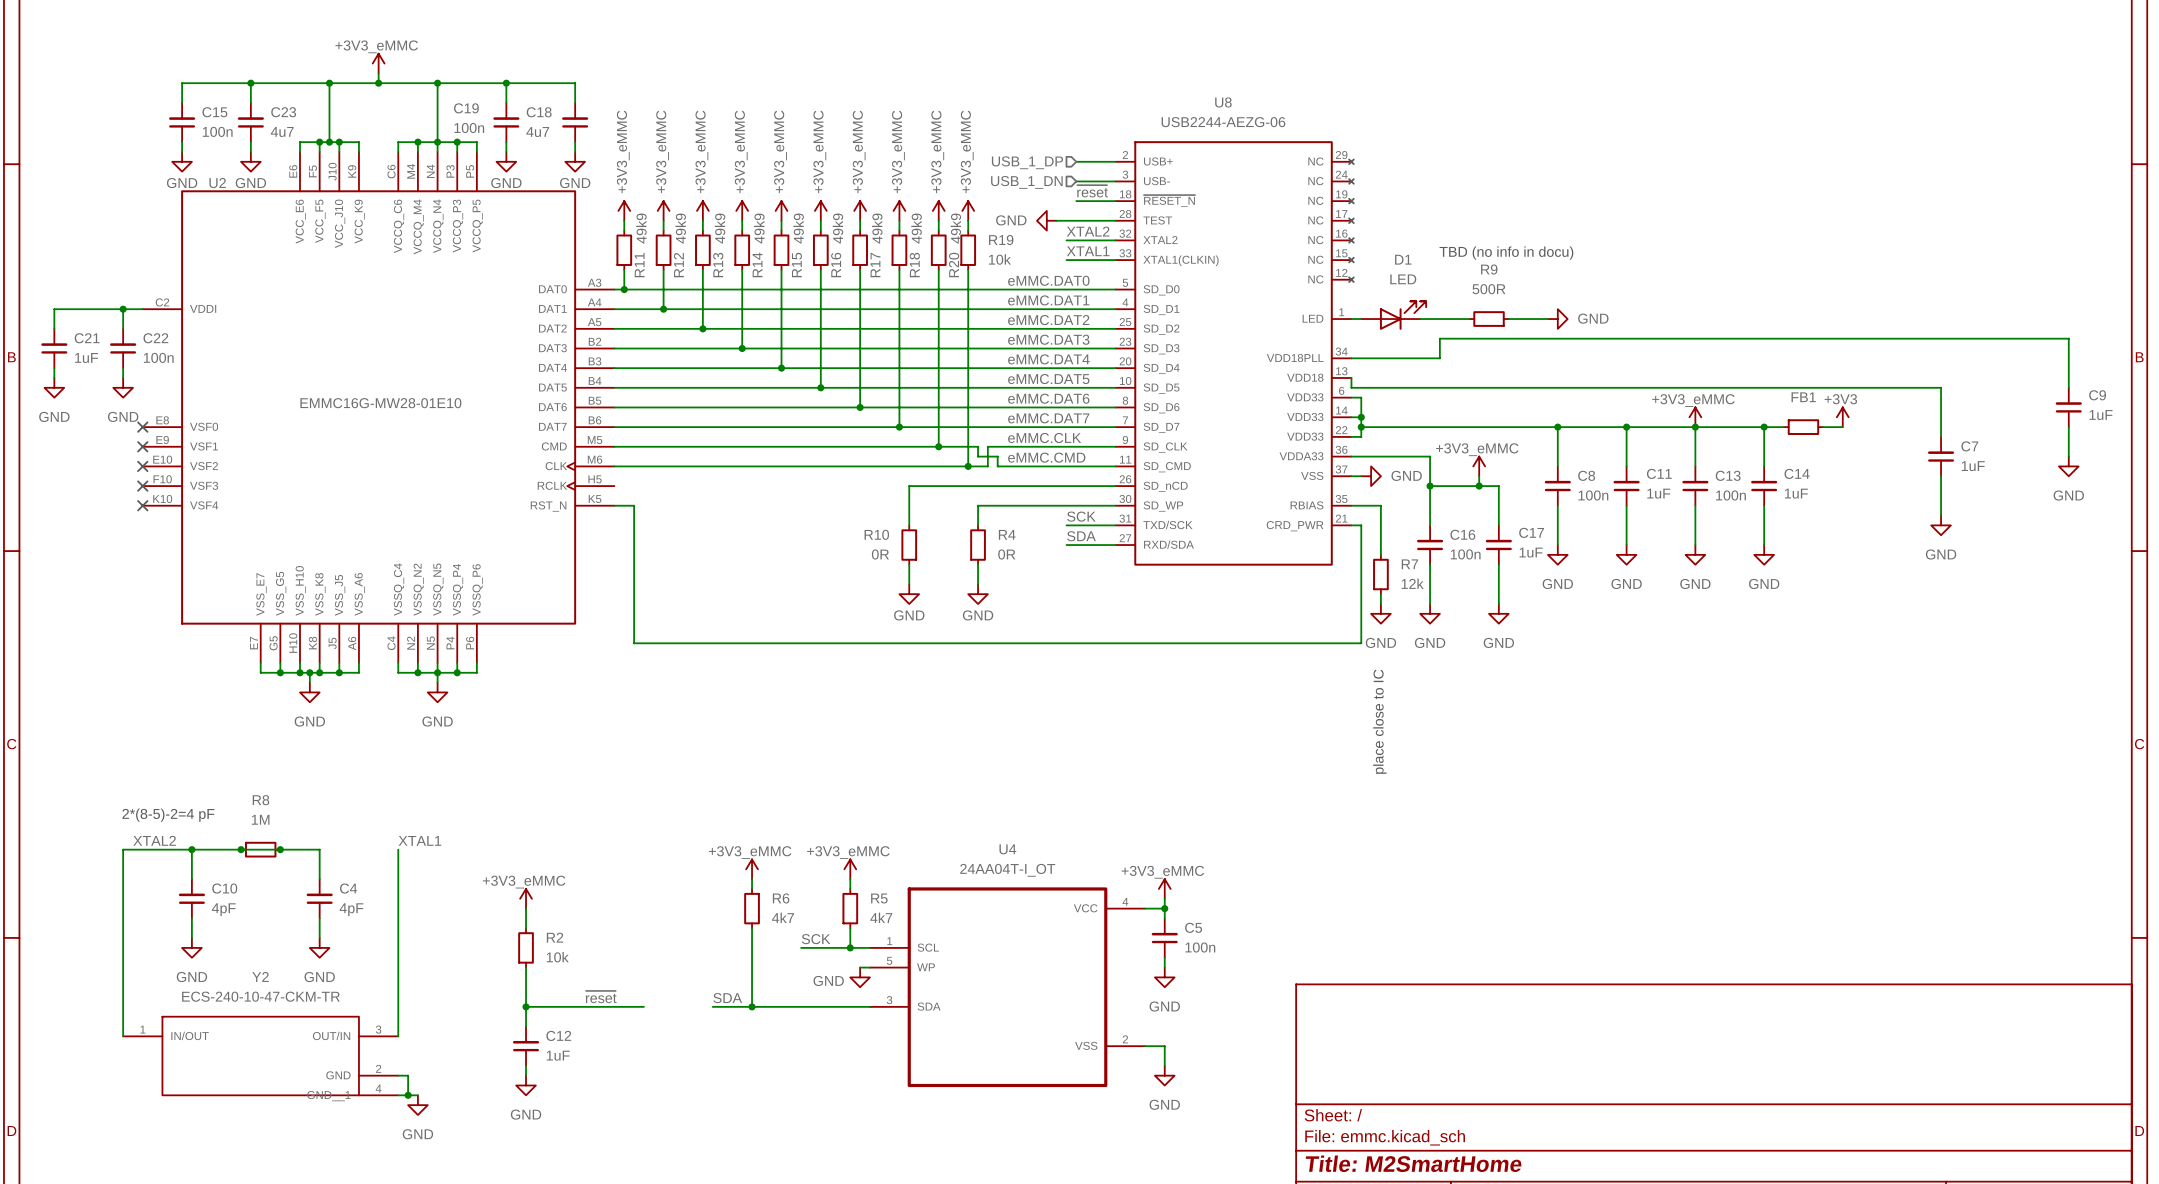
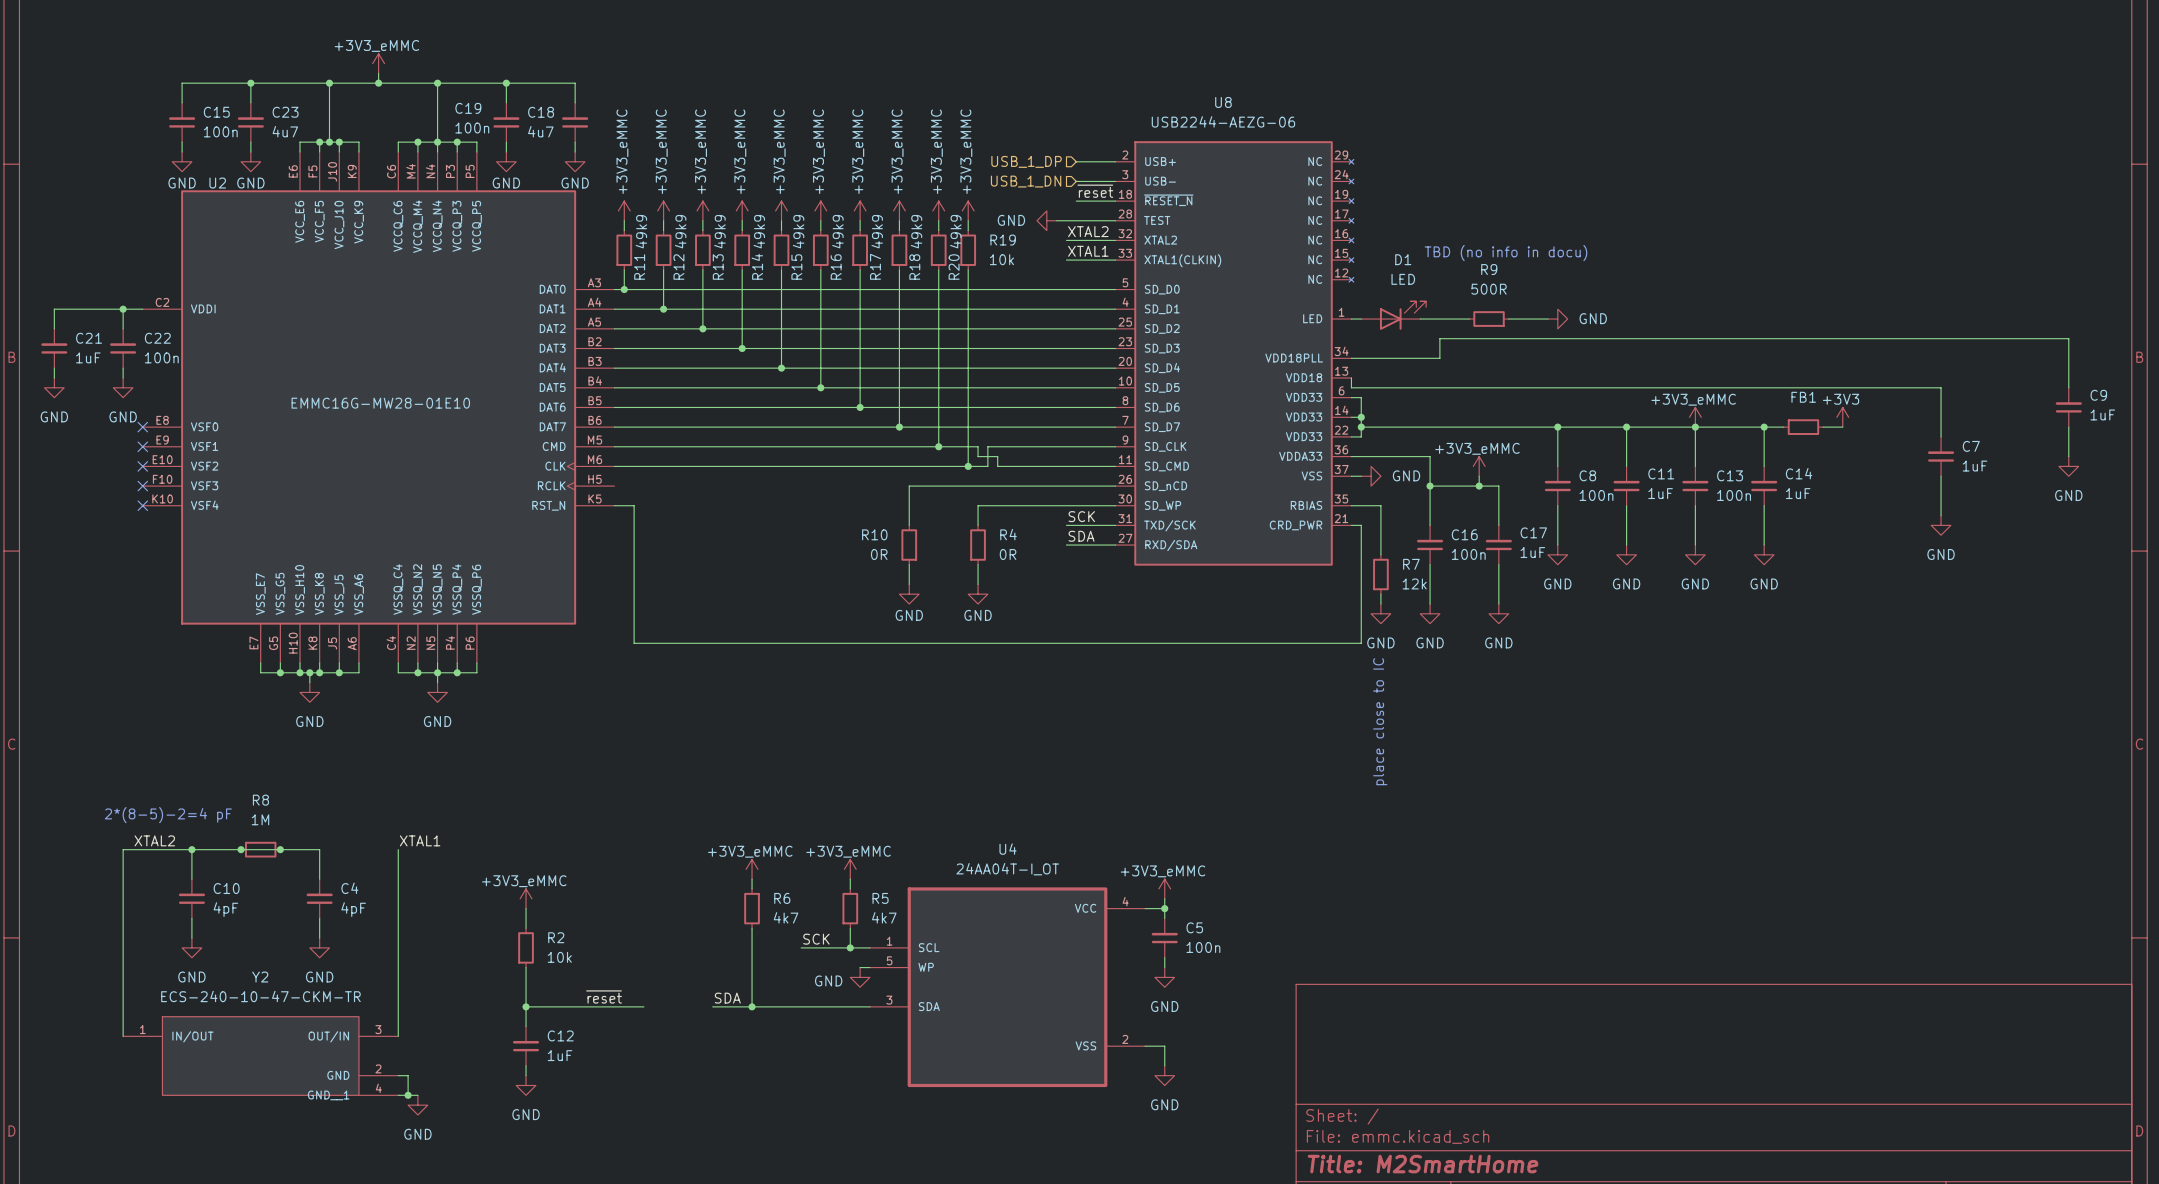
label: eMMC.DAT0 (1048, 280) -> none
label: eMMC.DAT1 (1048, 300) -> none
label: eMMC.DAT2 (1048, 320) -> none
label: eMMC.DAT3 (1048, 339) -> none
label: eMMC.DAT4 (1048, 359) -> none
label: eMMC.DAT5 (1048, 379) -> none
label: eMMC.DAT6 (1048, 398) -> none
label: eMMC.DAT7 (1048, 418) -> none
label: eMMC.CLK (1044, 437) -> none
label: eMMC.CMD (1046, 457) -> none

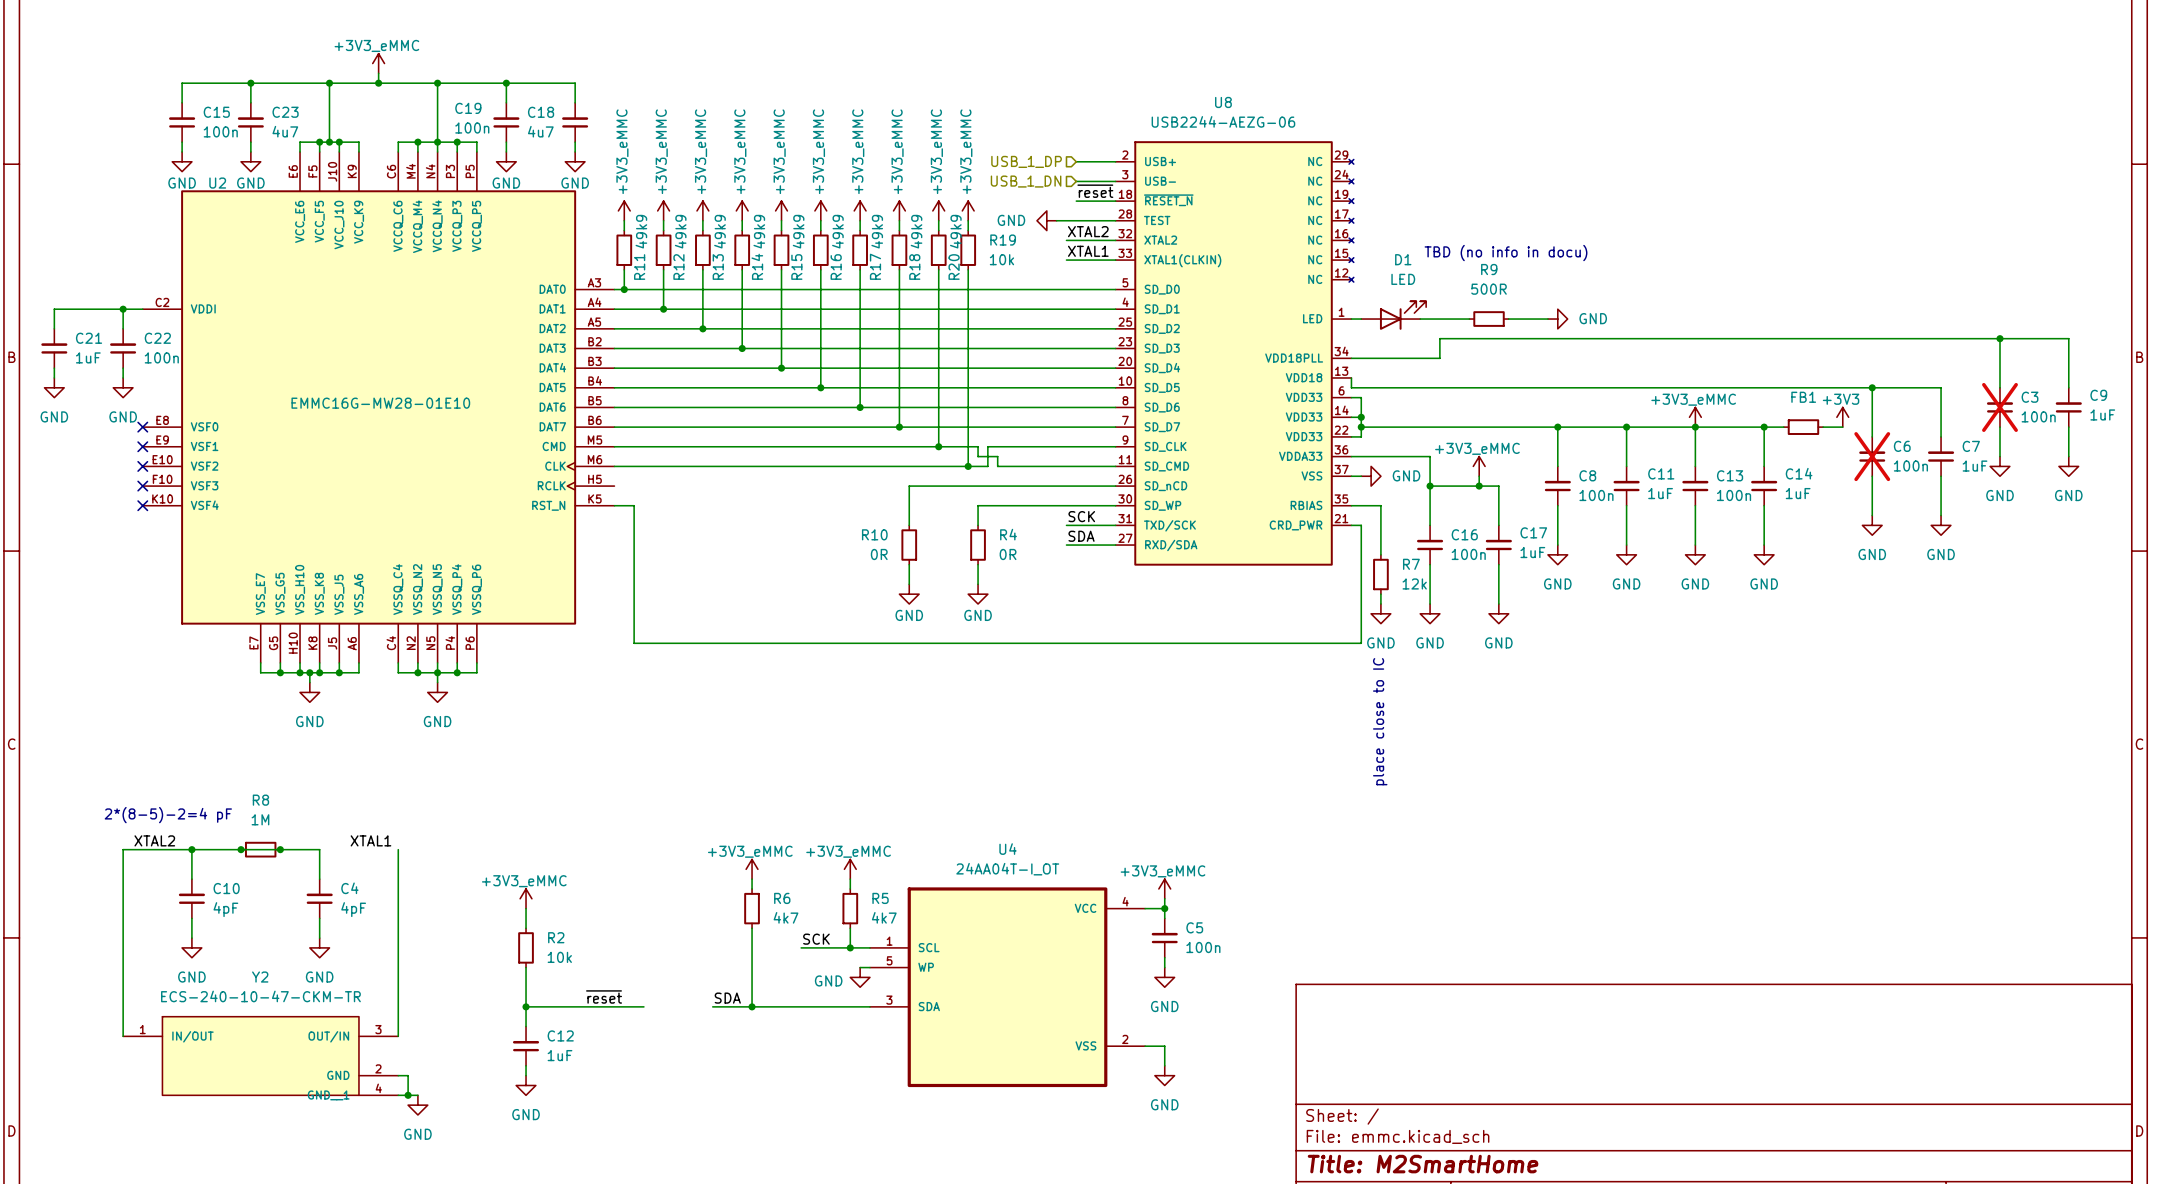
wire: none -> (2000, 338) (2000, 387)
junction: none -> (2000, 338)
wire: none -> (1872, 387) (1872, 436)
junction: none -> (1872, 387)
C3: none -> (2000, 407)
wire: none -> (2000, 427) (2000, 456)
C6: none -> (1872, 456)
power symbol: none -> GND (2000, 466)
wire: none -> (1872, 476) (1872, 515)
power symbol: none -> GND (1872, 525)
label position: XTAL1 (420, 840) -> XTAL1 (370, 840)

